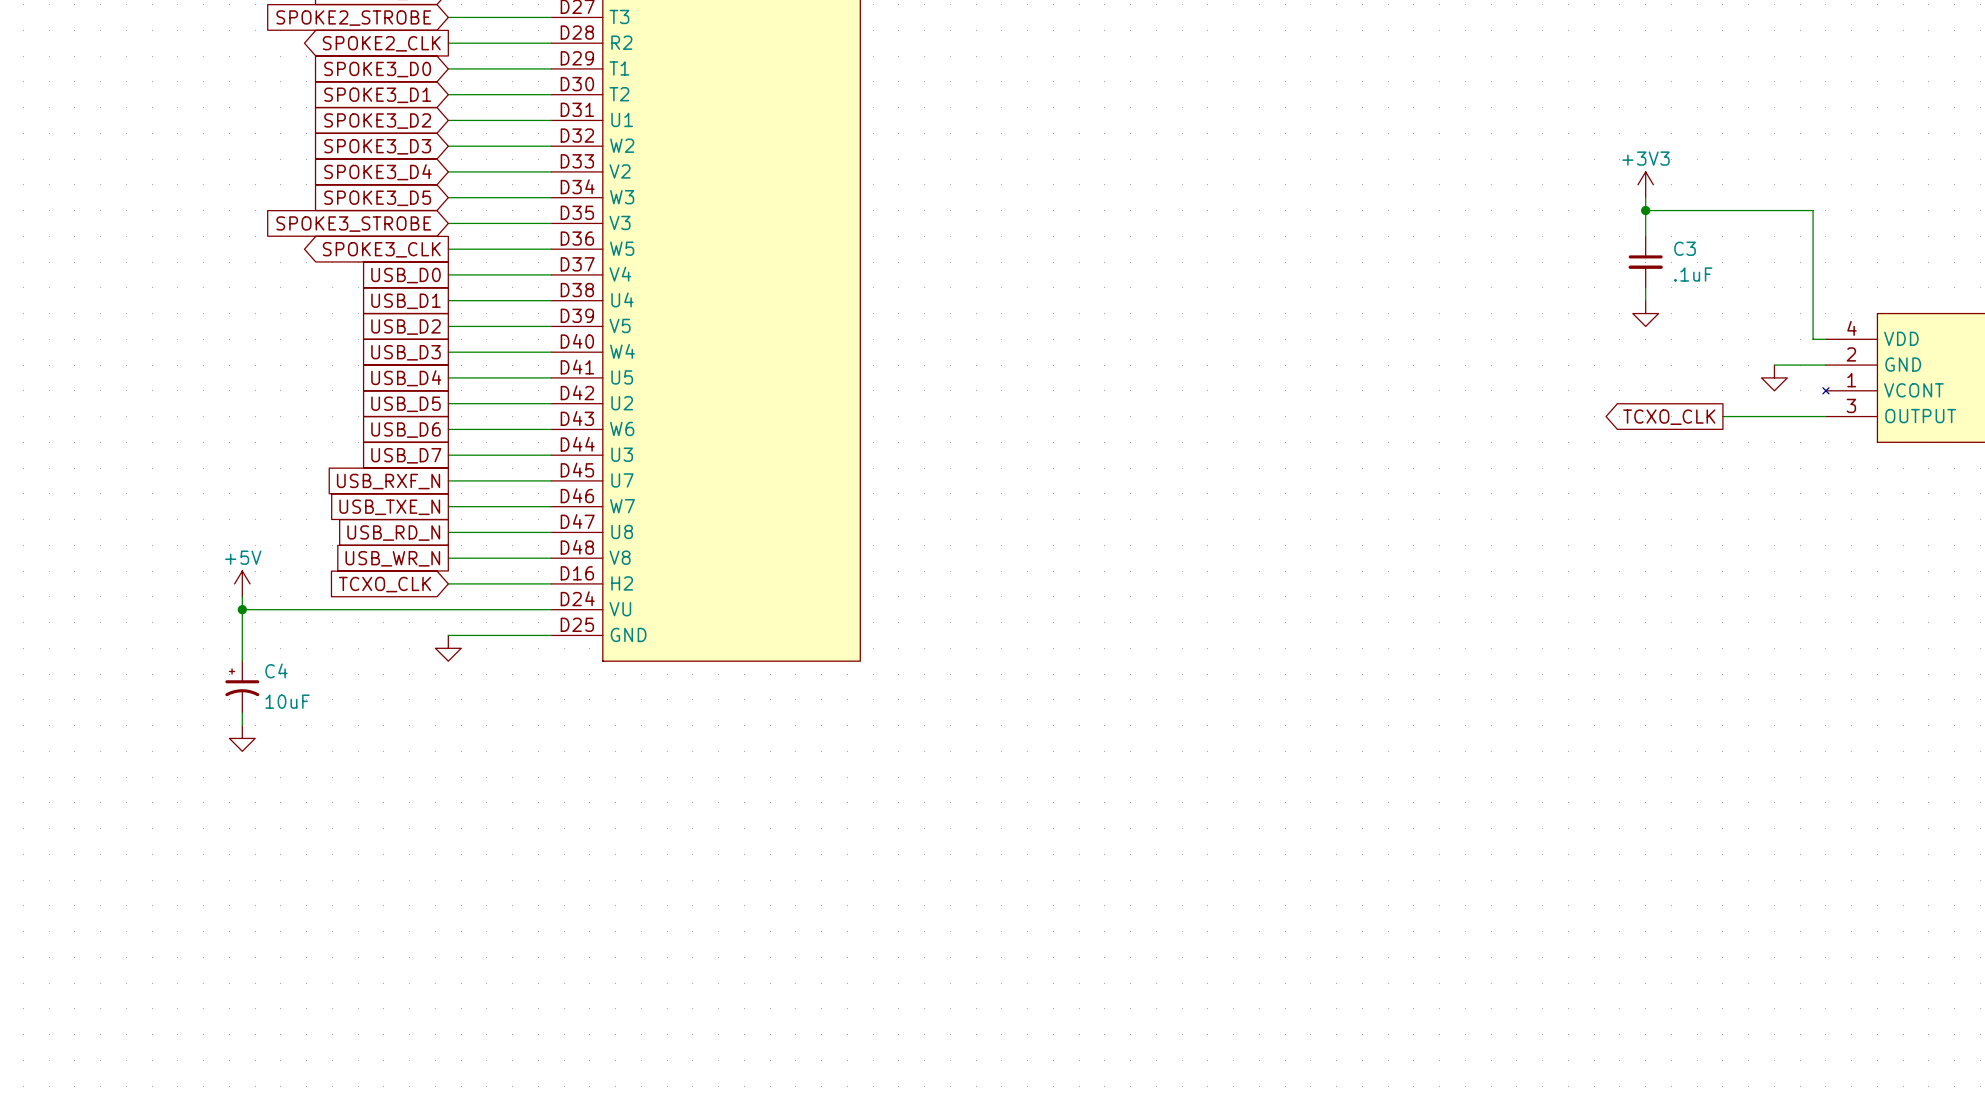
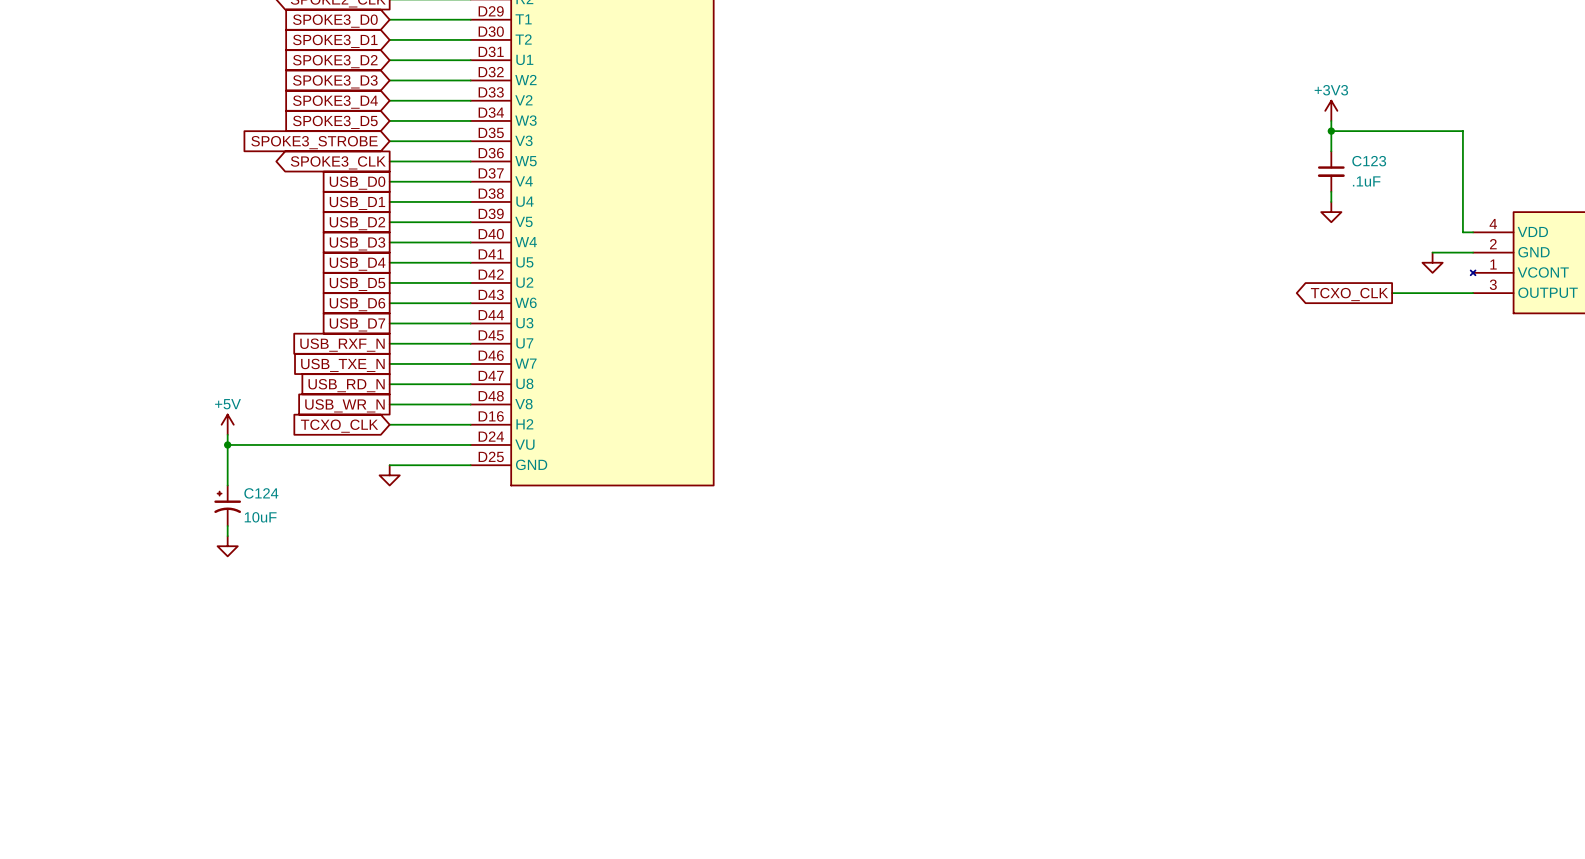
C3 name: C3 (1685, 248) -> C123 (1369, 161)
C4 name: C4 (276, 670) -> C124 (261, 493)

